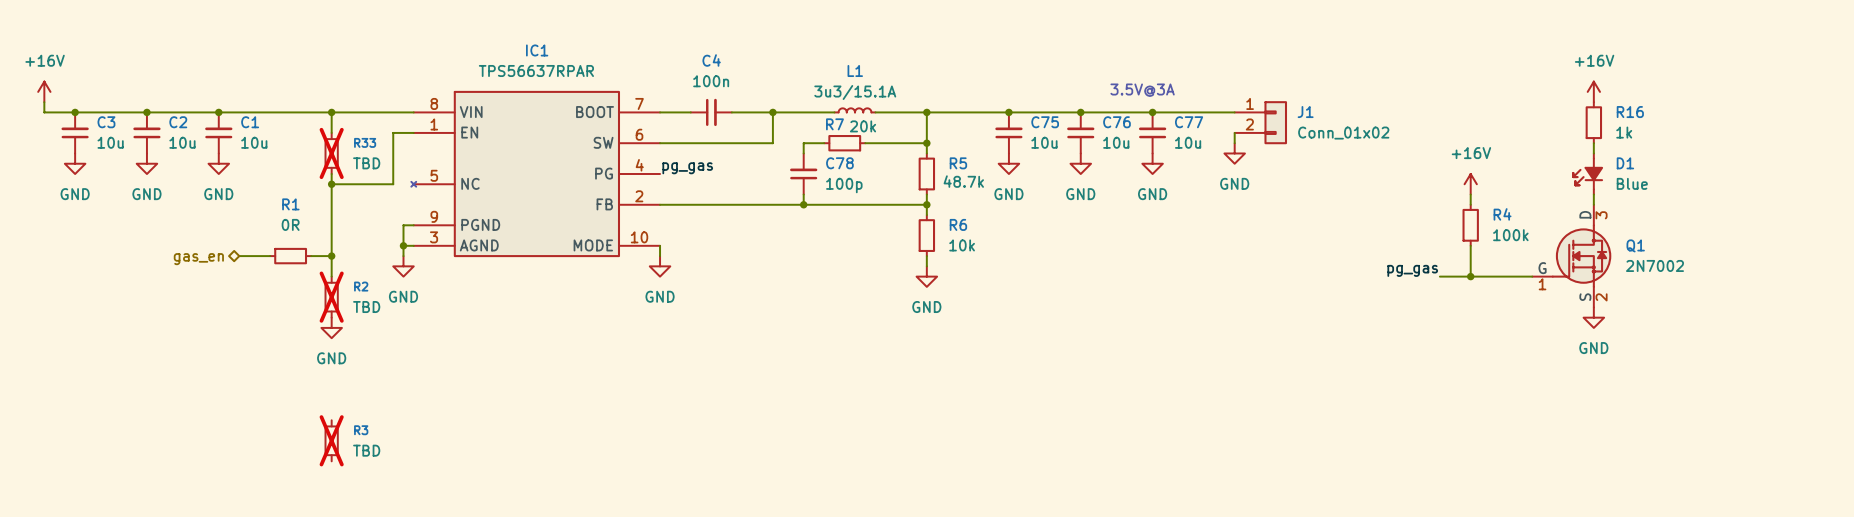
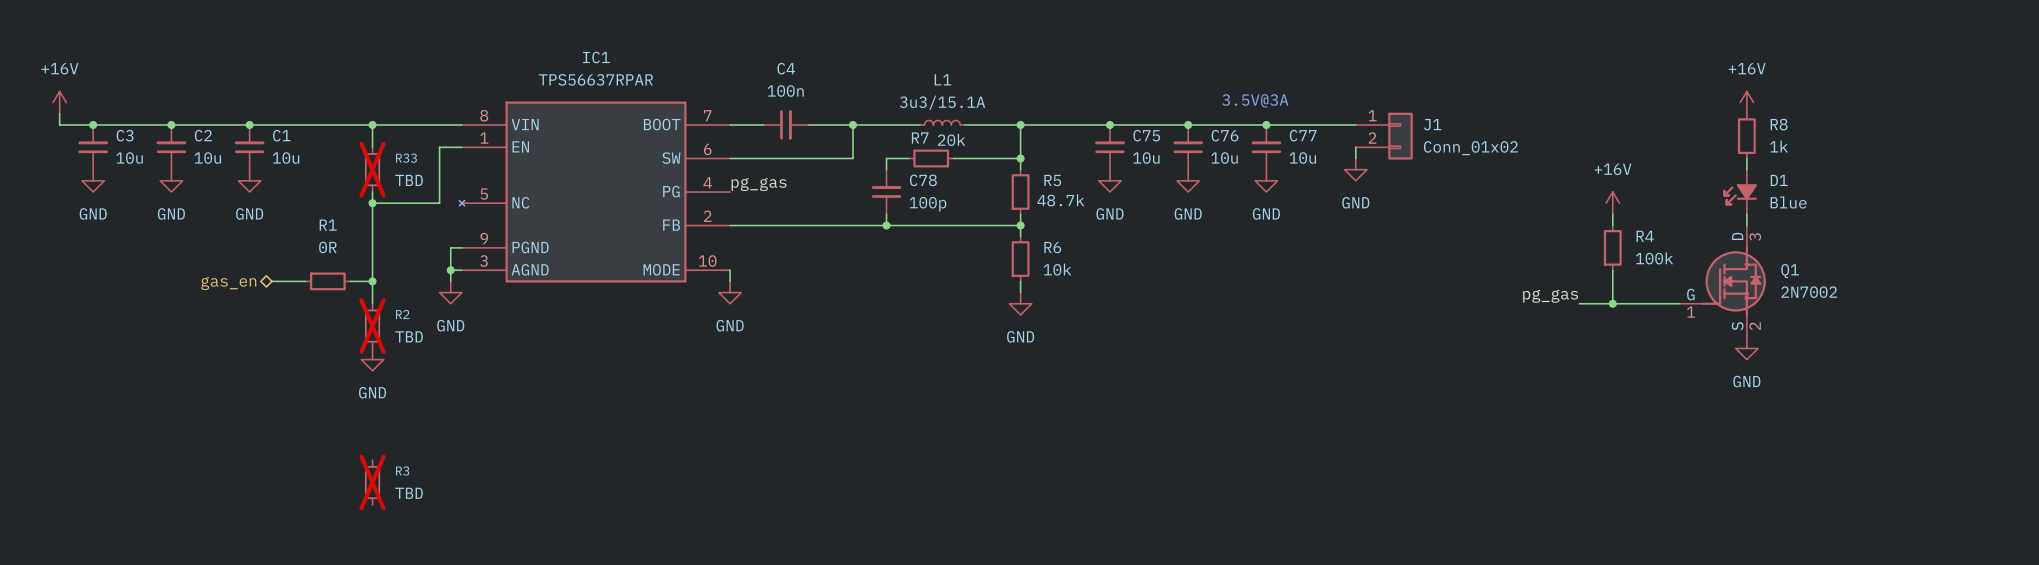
R16 name: R16 (1630, 112) -> R8 (1779, 124)

